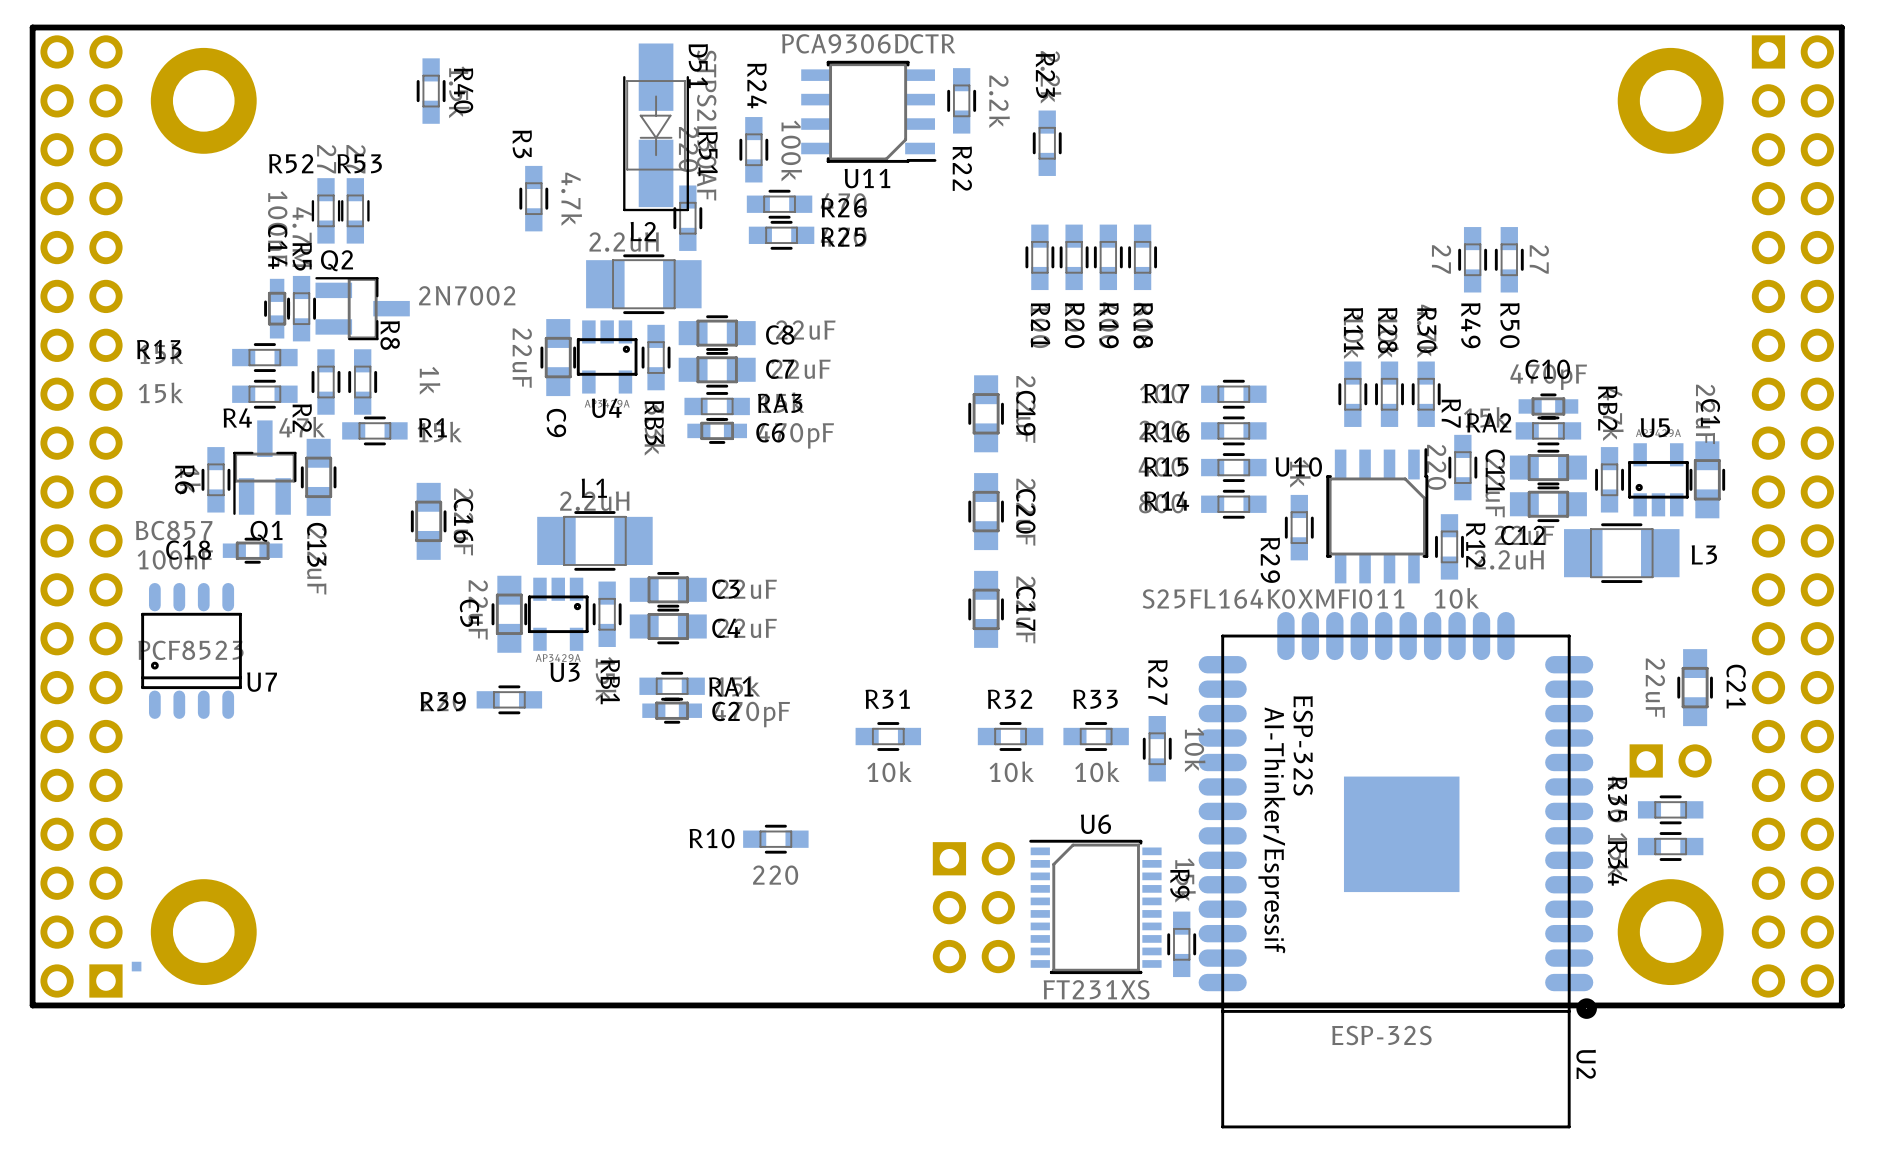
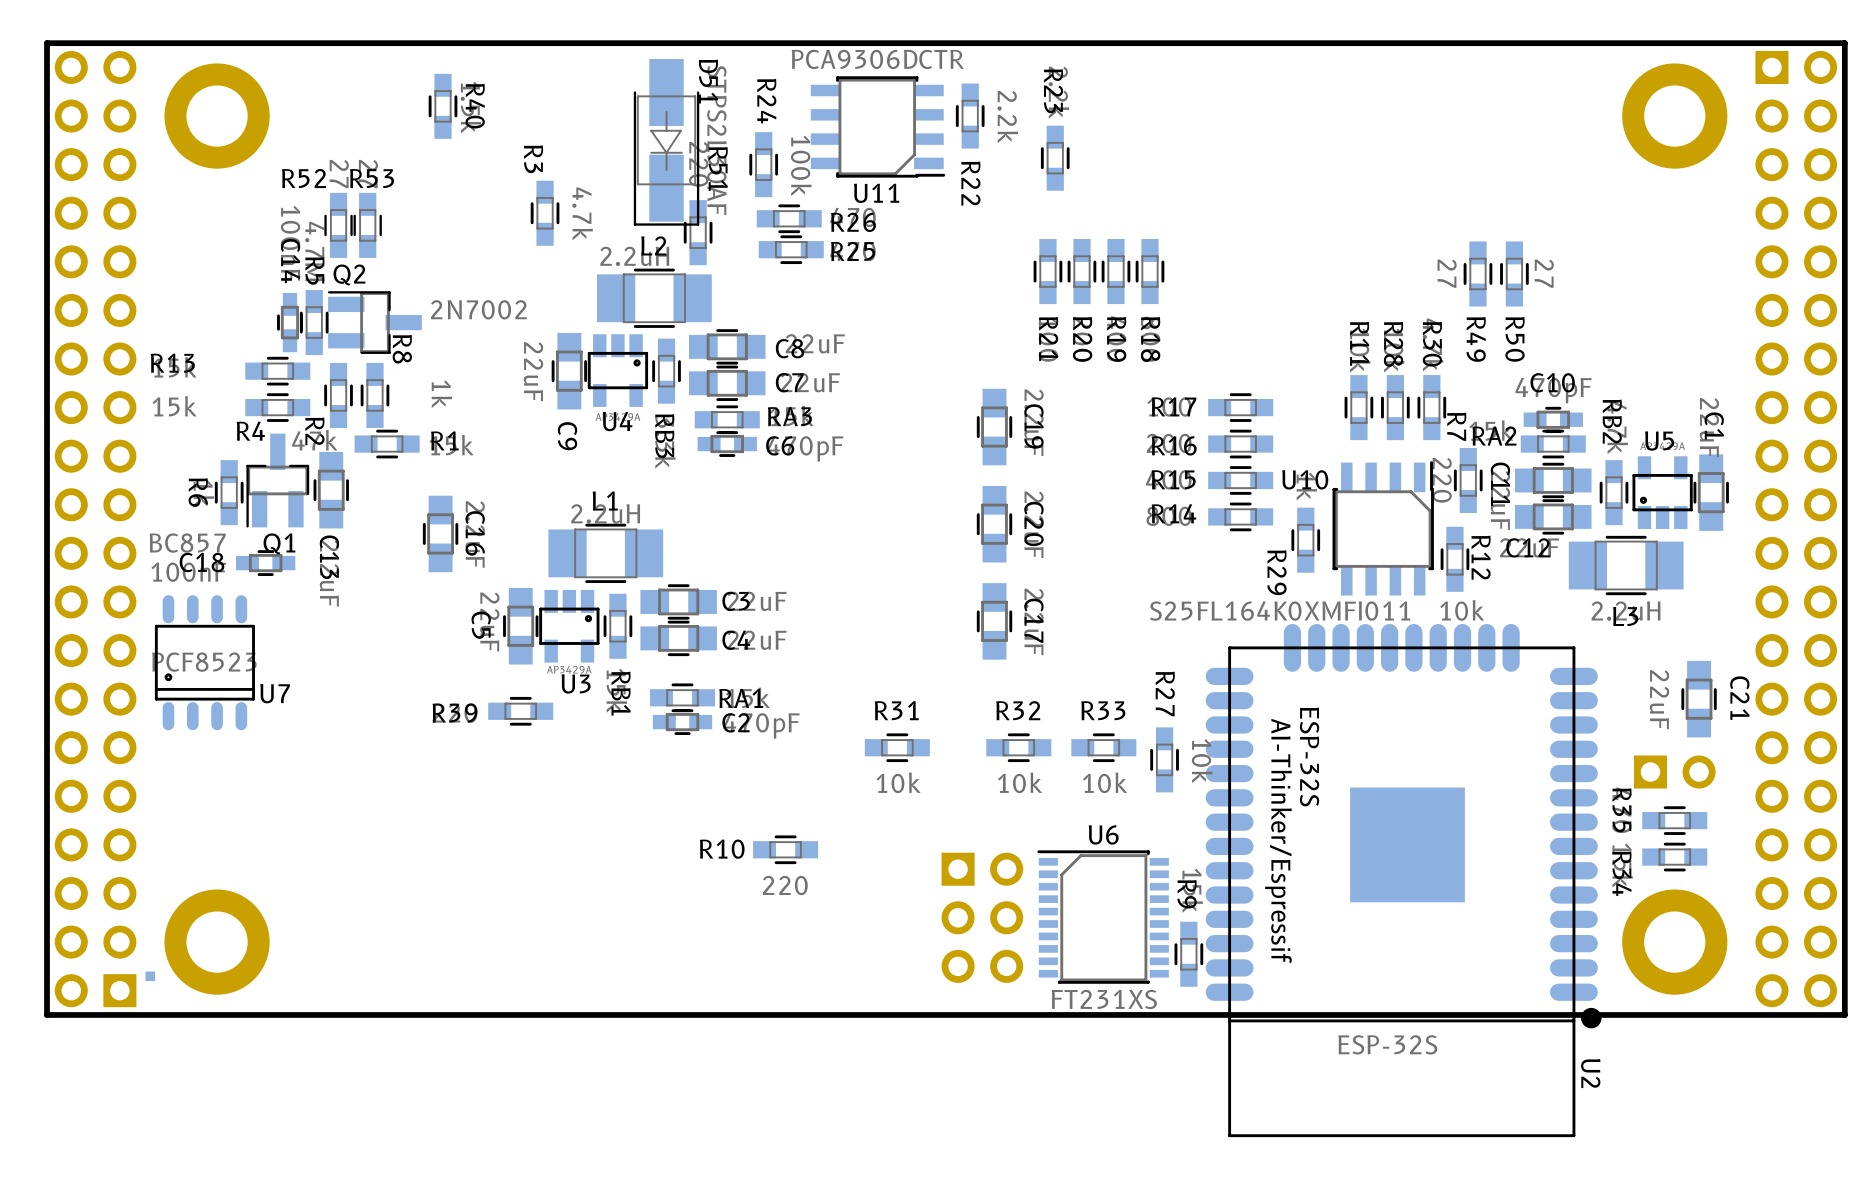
L3 name position: L3 (1704, 554) -> L3 (1625, 616)
L3 value position: 2.2uH (1509, 559) -> 2.2uH (1626, 611)

